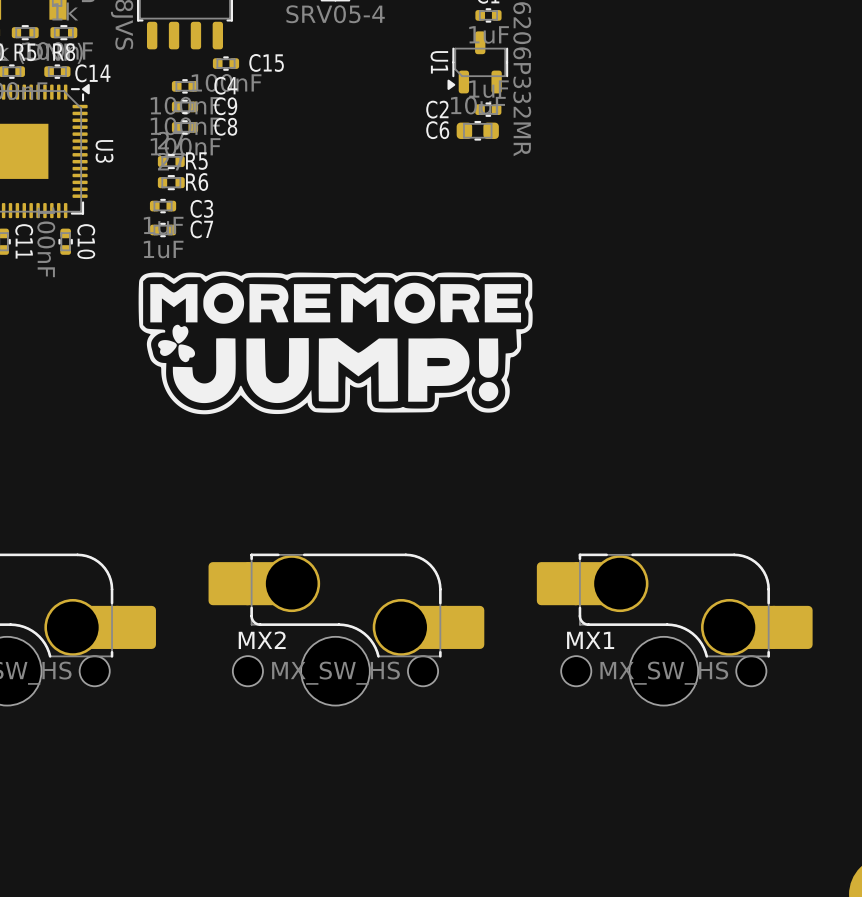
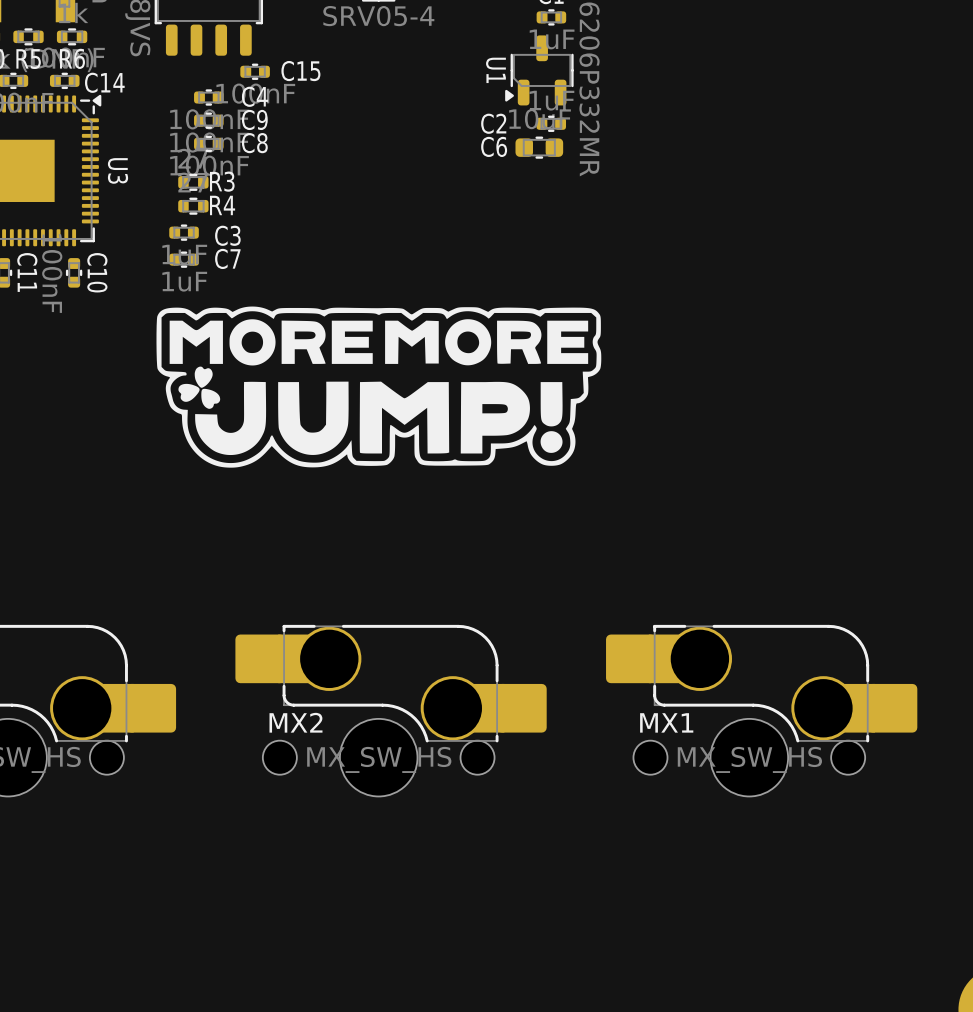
R8 name: R8 (64, 52) -> R6 (72, 58)
R5 name: R5 (196, 161) -> R3 (222, 181)
R6 name: R6 (197, 182) -> R4 (222, 205)

